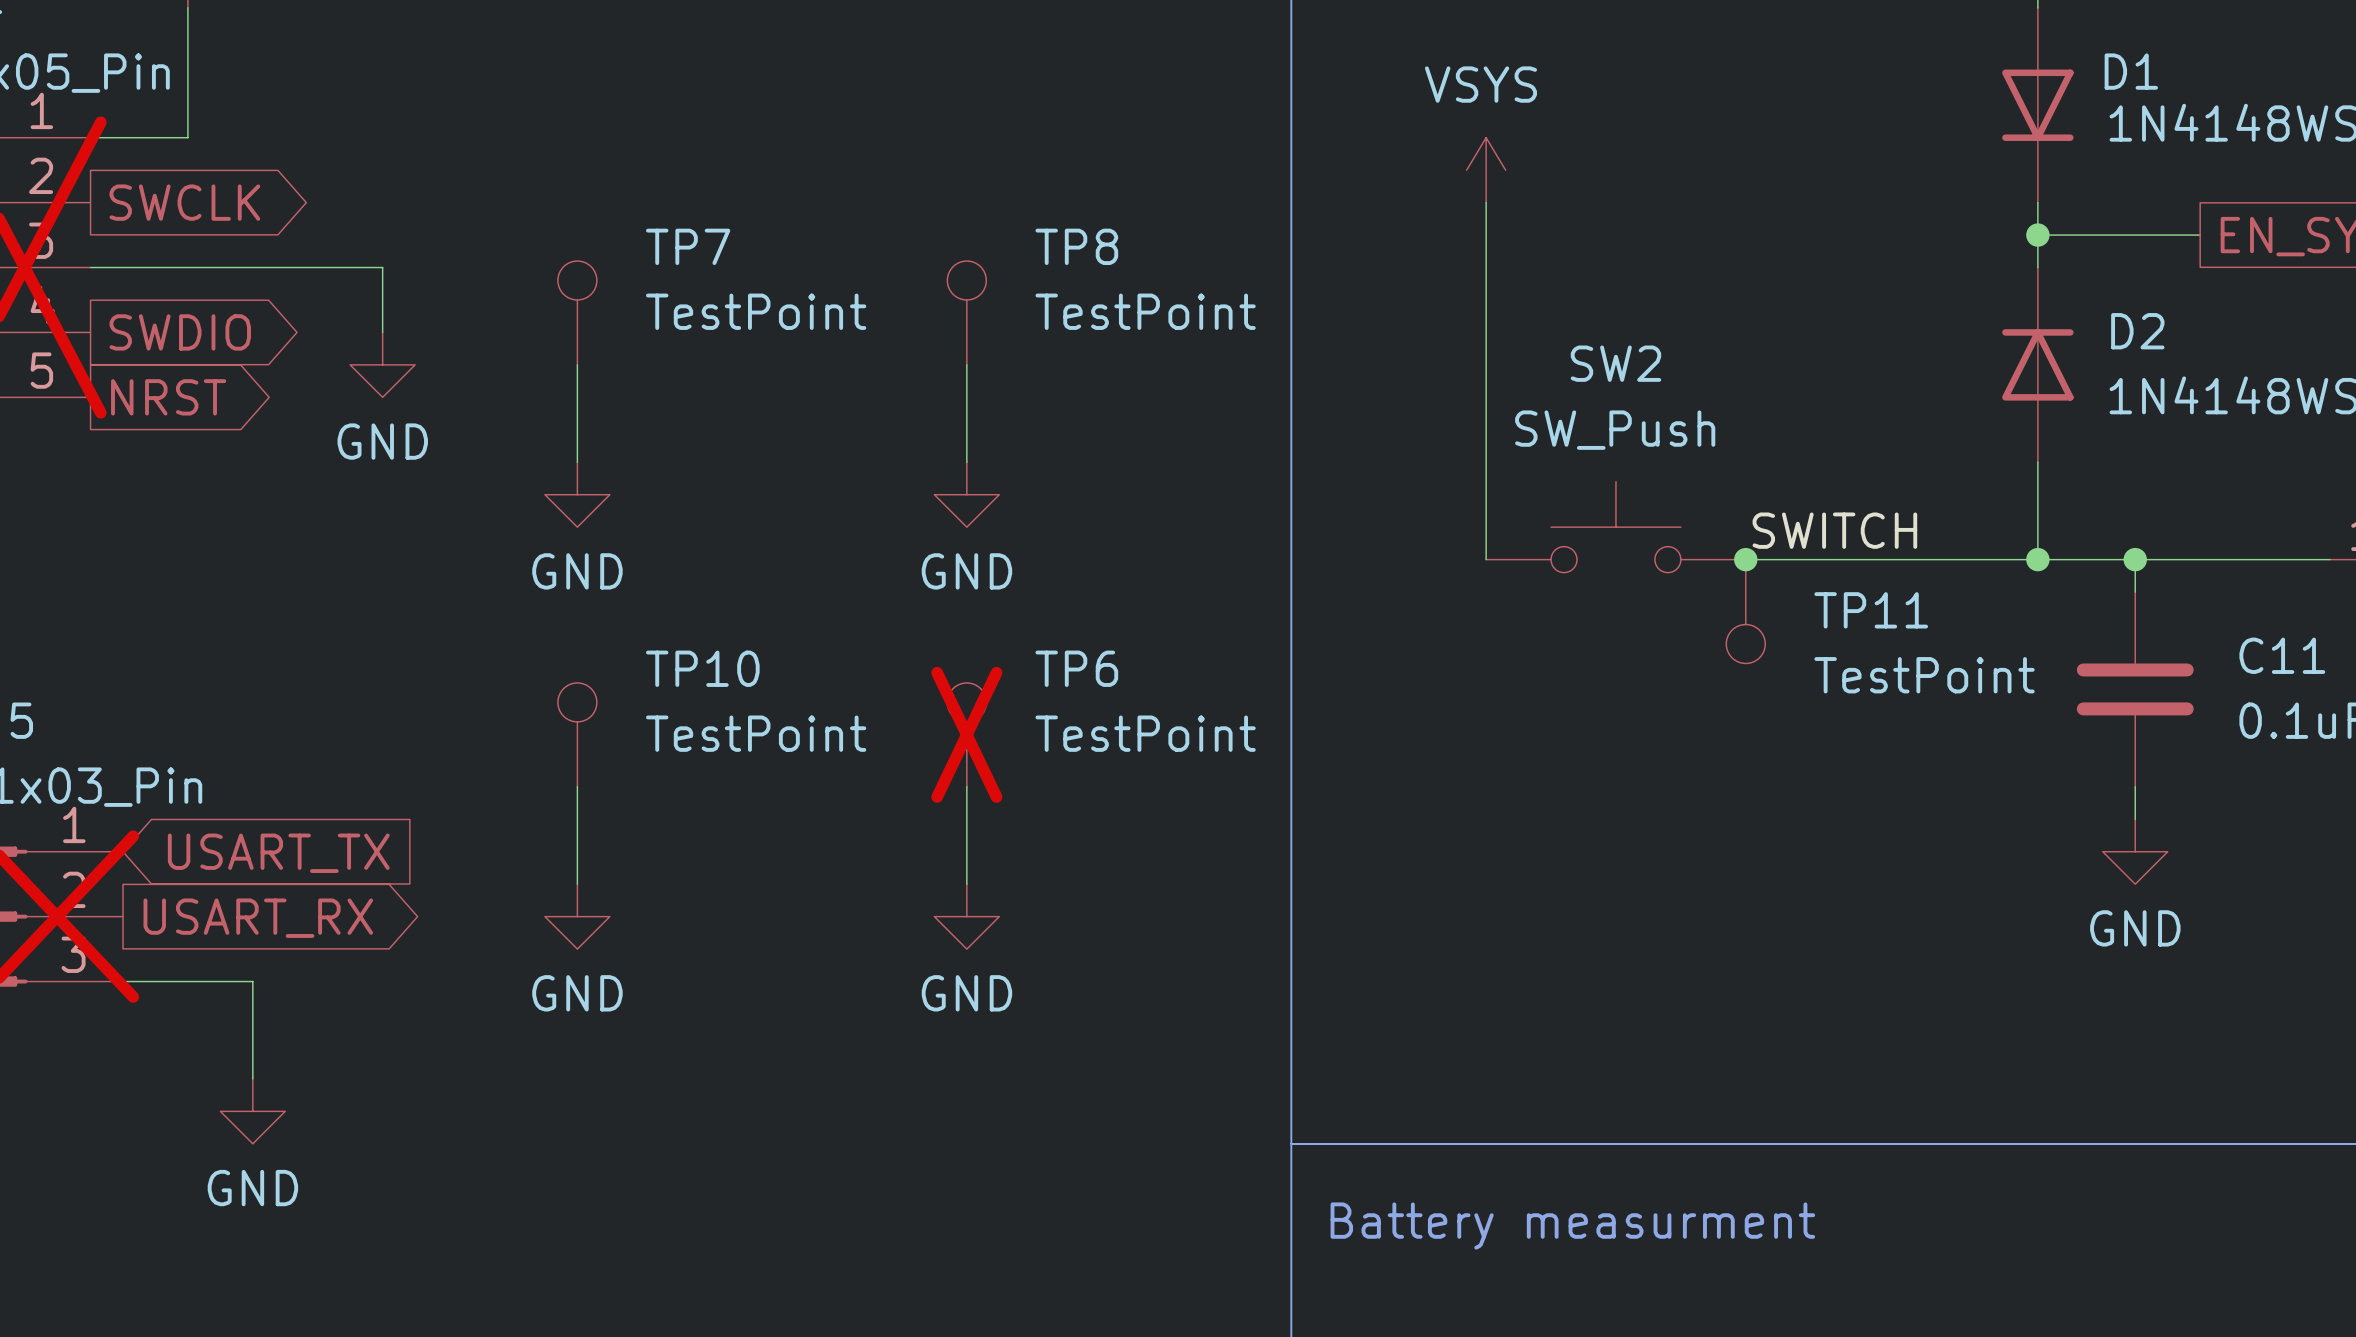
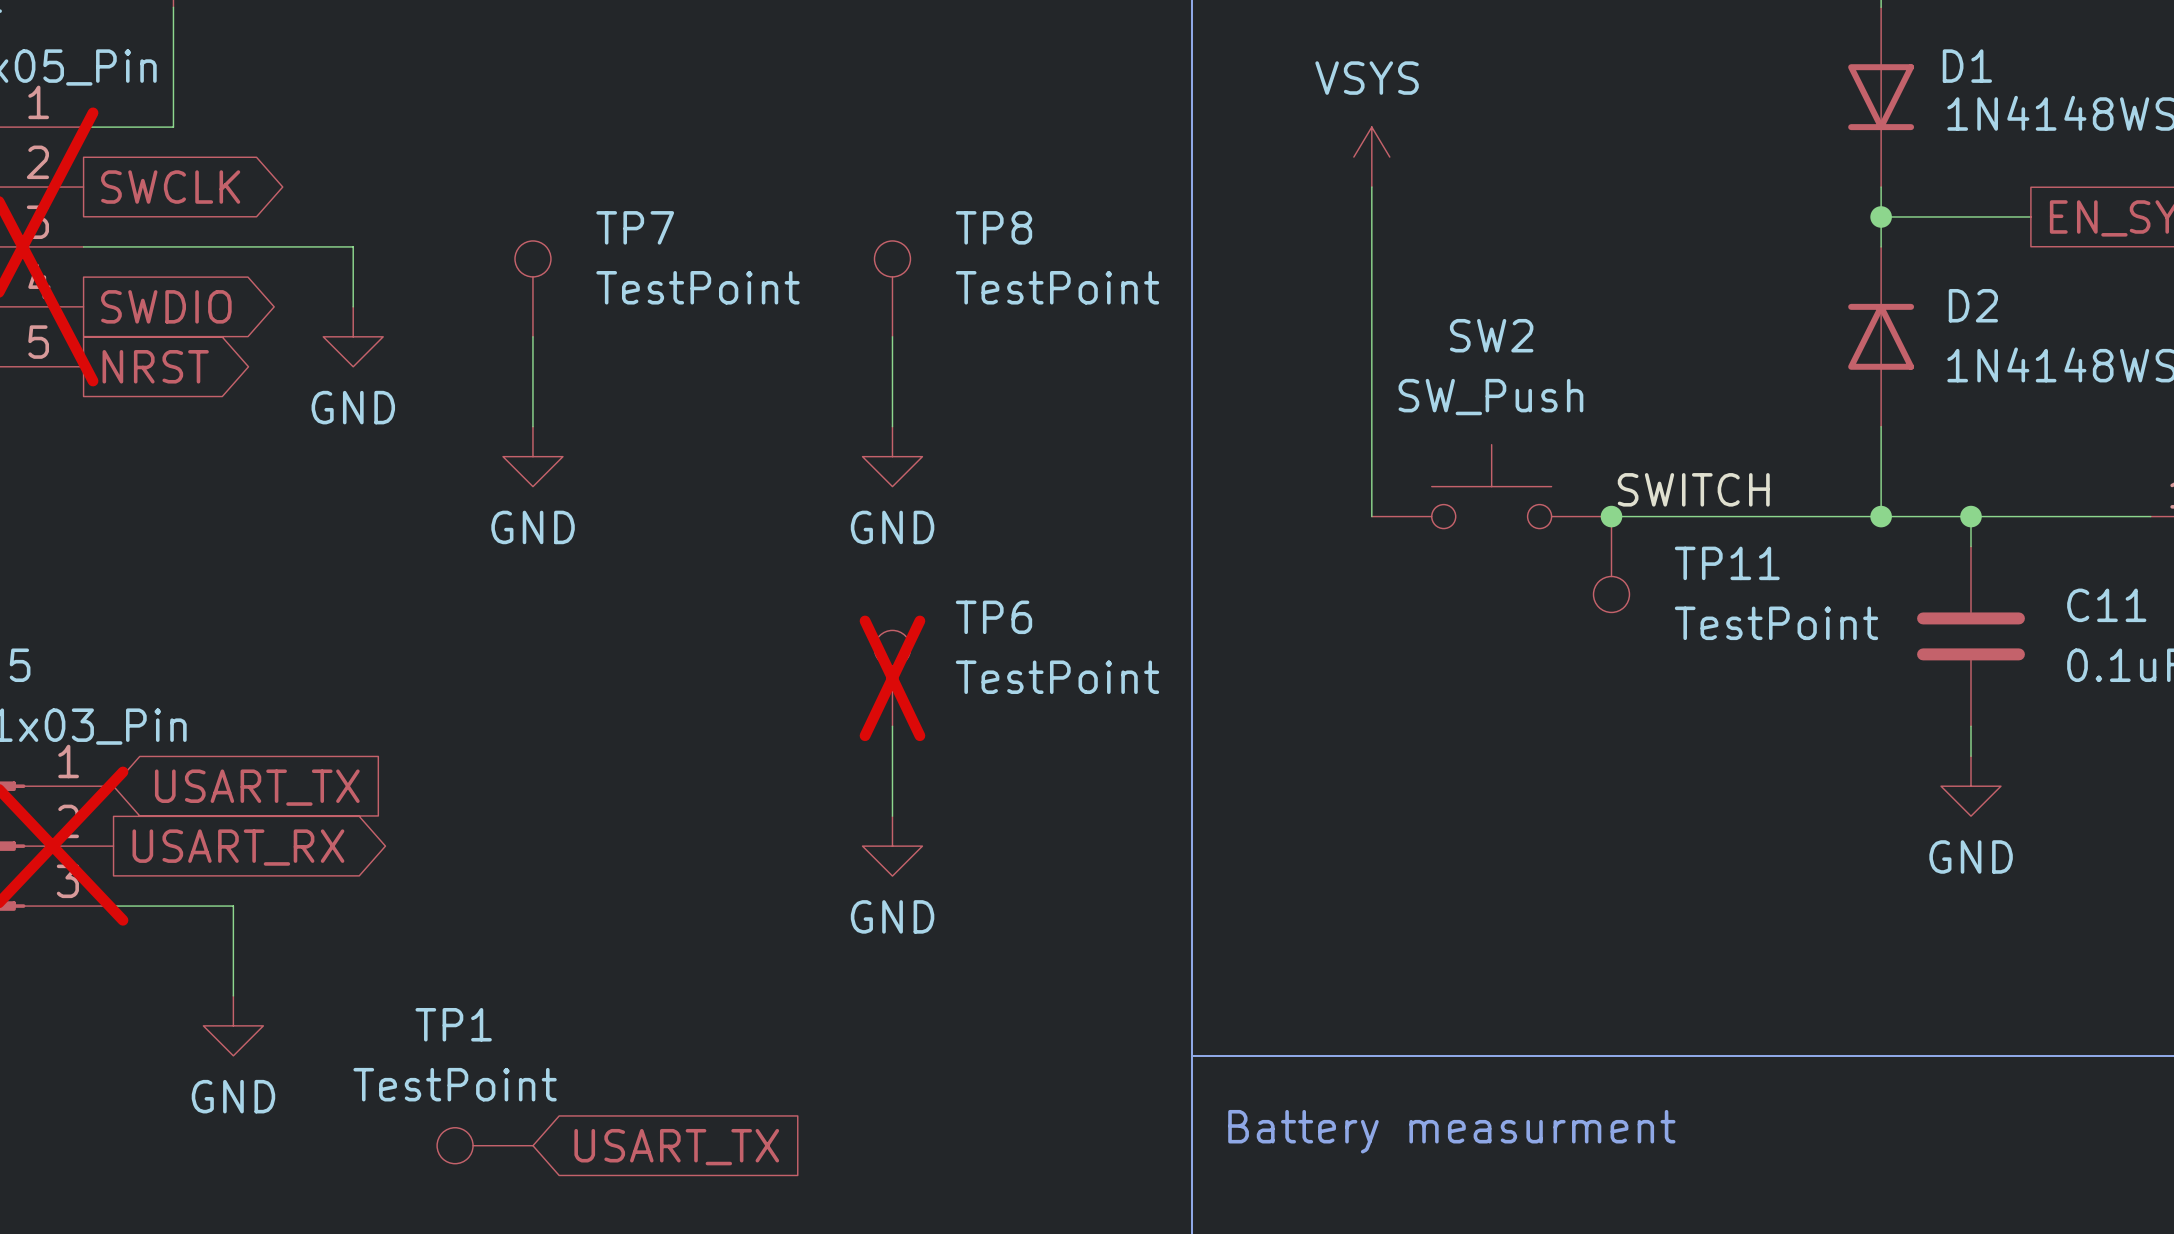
TP10: TestPoint (577, 734) -> none
wire: (577, 786) (577, 884) -> none
power symbol: GND (577, 916) -> none
TP1: none -> TestPoint (485, 1145)
global label: none -> USART_TX (676, 1147)

